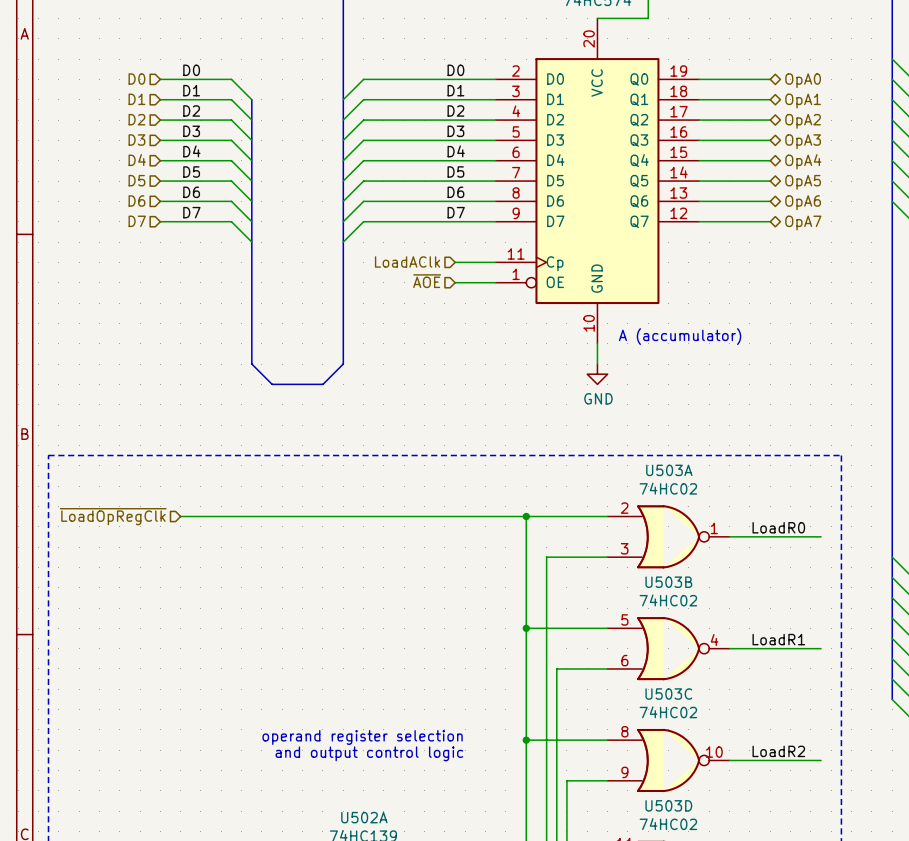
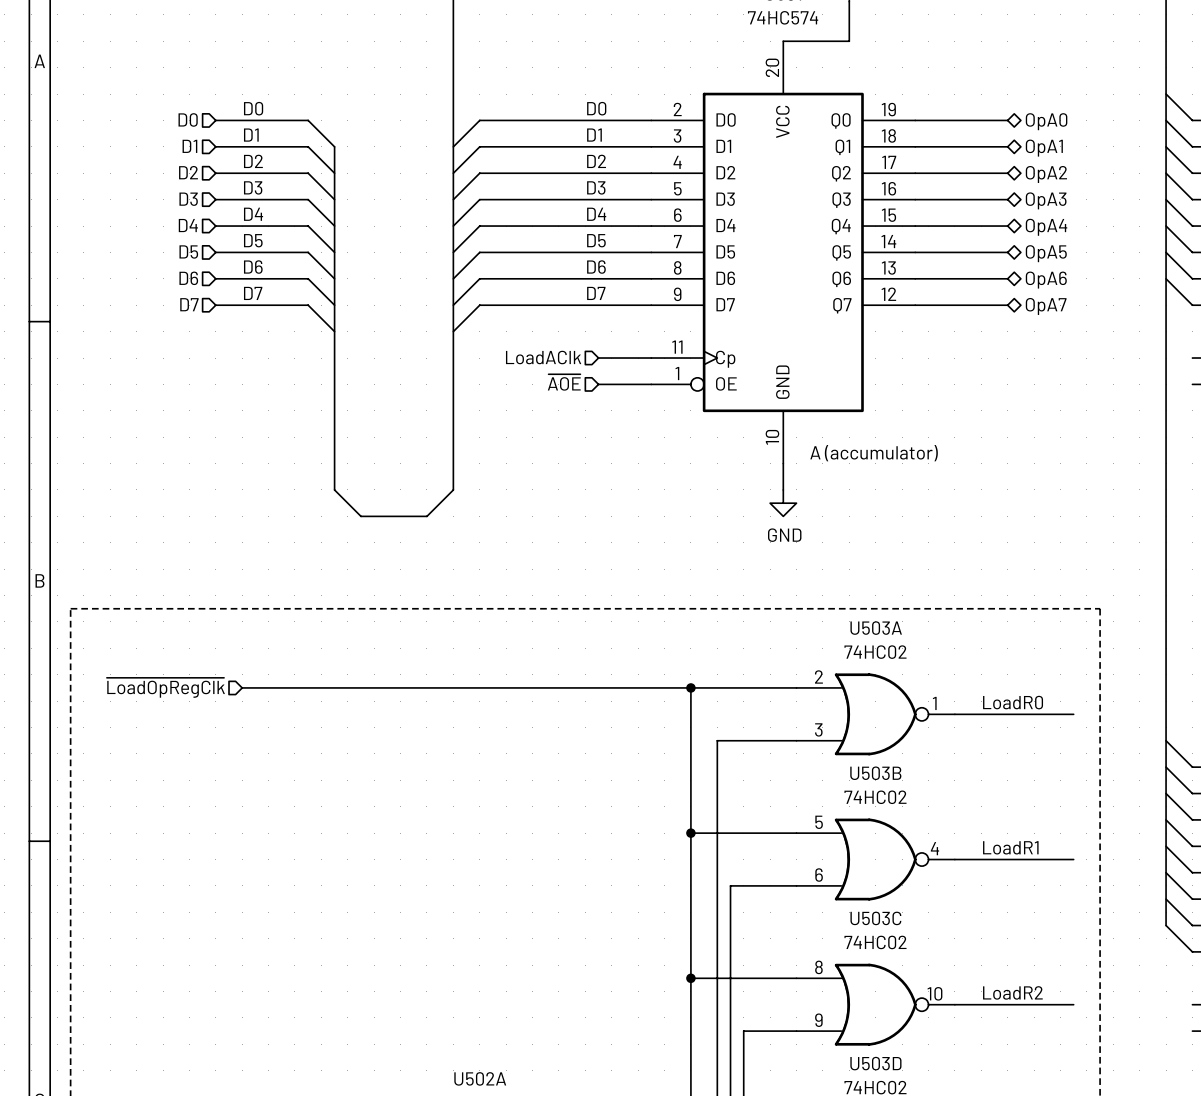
text: operand register selection (362, 737) -> none
text: and output control logic (369, 753) -> none

